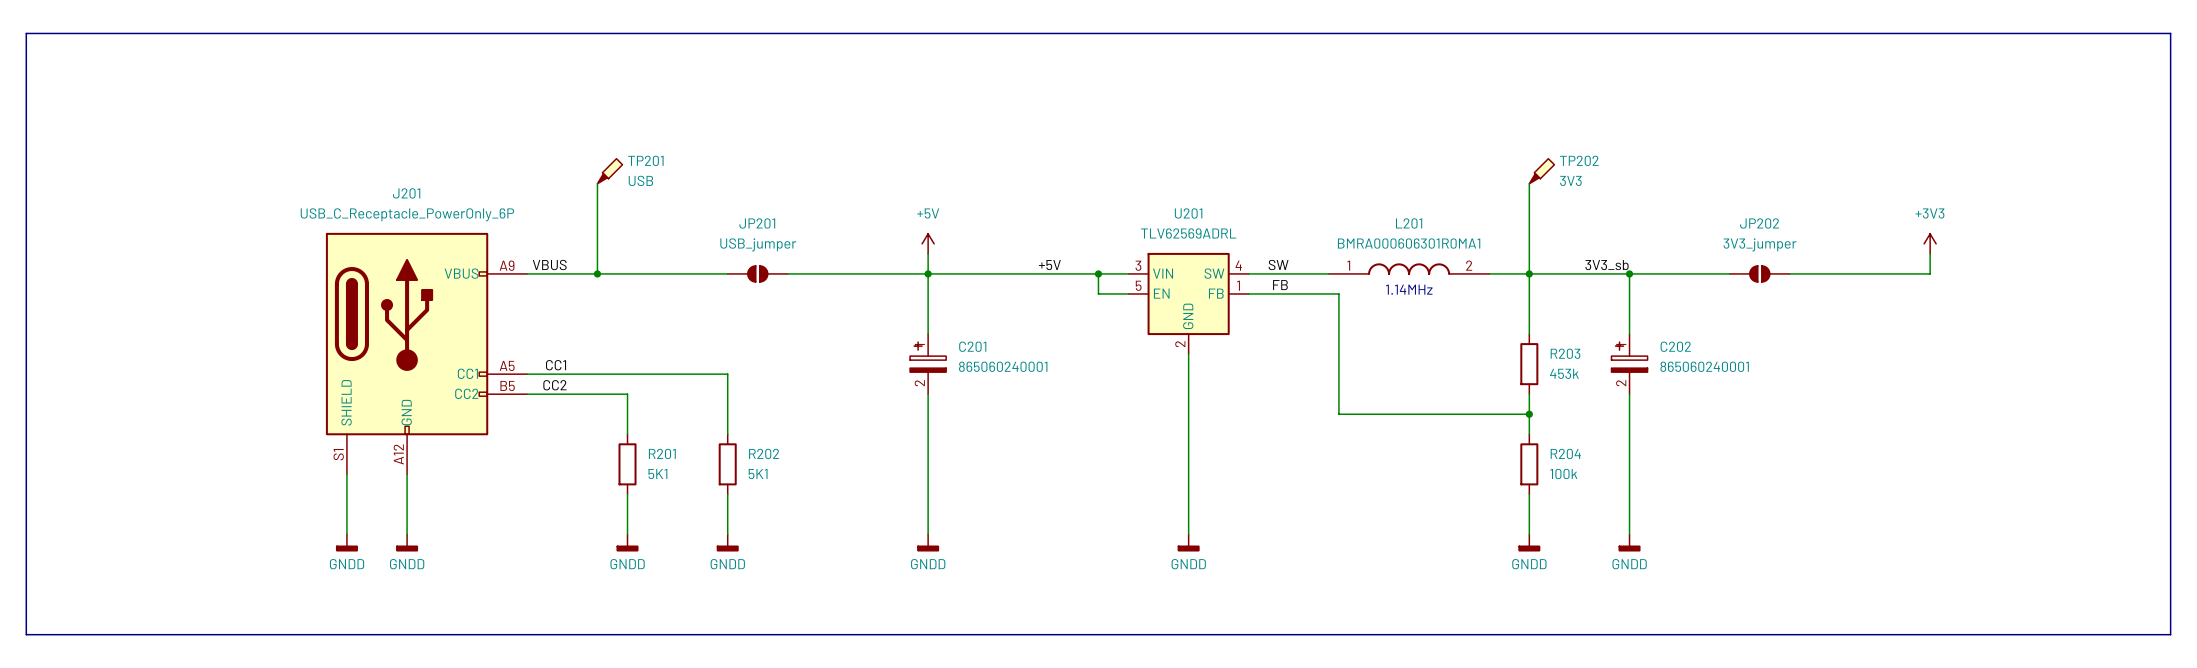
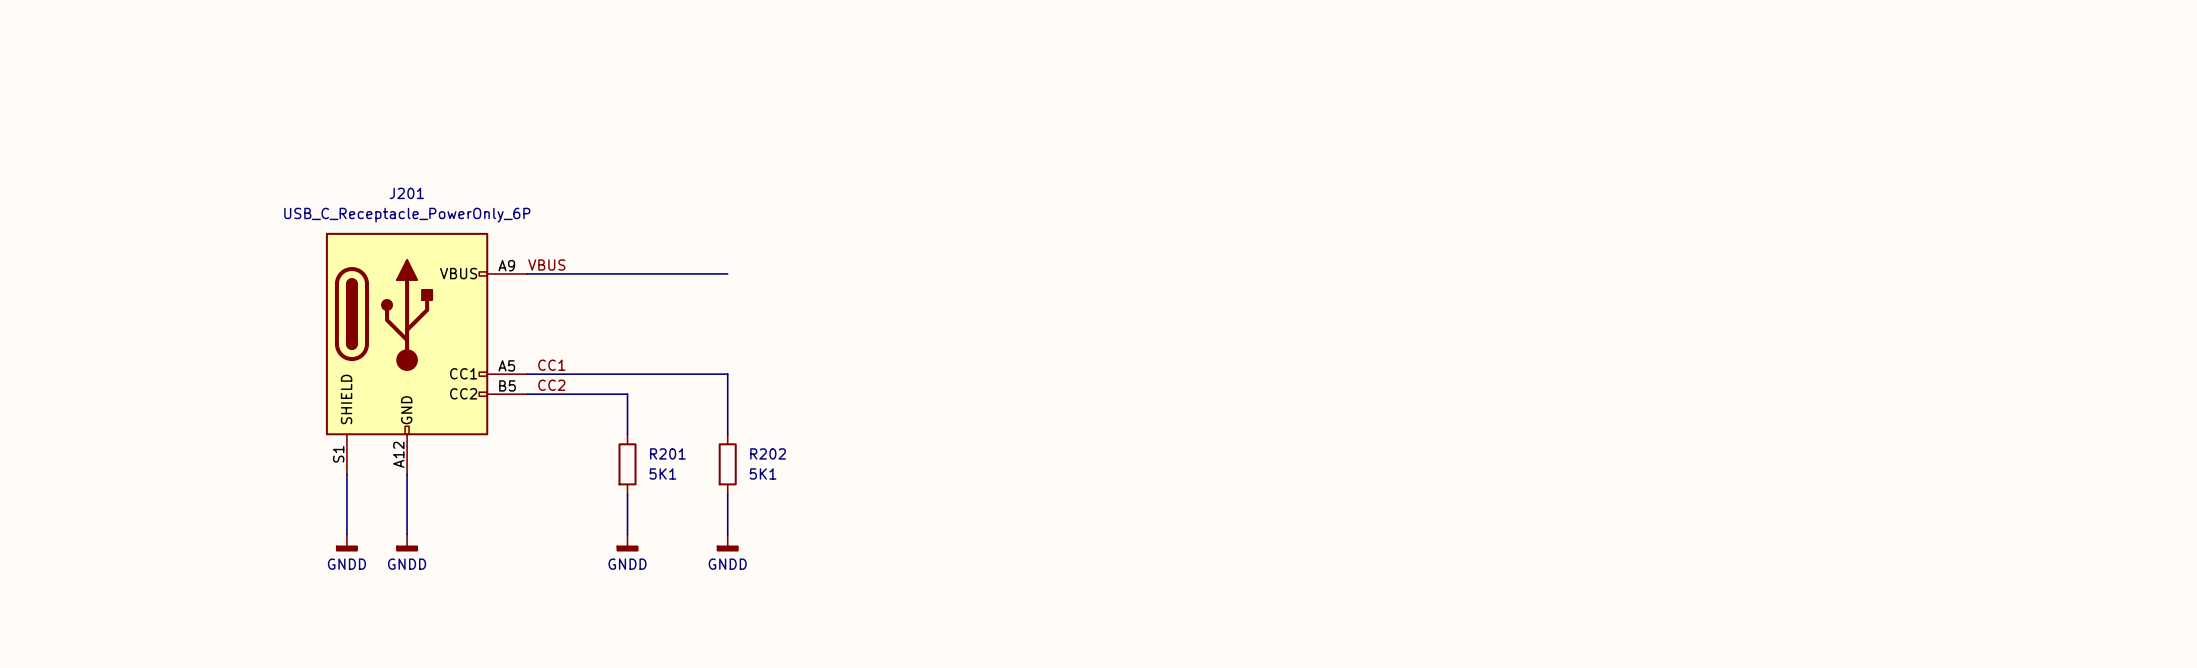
line: (26, 33) (2170, 33) (2170, 634) (26, 634) (26, 33) -> none
TP201: USB (609, 171) -> none
TP202: 3V3 (1541, 171) -> none
wire: (597, 183) (597, 273) -> none
wire: (1529, 183) (1529, 334) -> none
power symbol: +5V (928, 243) -> none
power symbol: +3V3 (1930, 243) -> none
wire: (928, 253) (928, 334) -> none
wire: (1930, 253) (1930, 273) (1789, 273) -> none
label: +5V (1049, 265) -> none
label: SW (1278, 265) -> none
label: 3V3_sb (1607, 265) -> none
L201: BMRA000606301R0MA1 (1409, 269) -> none
junction: (597, 273) -> none
JP201: USB_jumper (757, 273) -> none
wire: (787, 273) (1128, 273) -> none
junction: (928, 273) -> none
wire: (1098, 273) (1098, 293) (1128, 293) -> none
junction: (1098, 273) -> none
wire: (1248, 273) (1328, 273) -> none
wire: (1489, 273) (1729, 273) -> none
junction: (1529, 273) -> none
wire: (1629, 273) (1629, 334) -> none
junction: (1629, 273) -> none
JP202: 3V3_jumper (1759, 273) -> none
label: FB (1280, 285) -> none
text: 1.14MHz (1409, 289) -> none
wire: (1248, 293) (1338, 293) (1338, 414) (1529, 414) -> none
U201: TLV62569ADRL (1188, 303) -> none
wire: (1188, 354) (1188, 534) -> none
C201: 865060240001 (928, 364) -> none
R203: 453k (1529, 364) -> none
C202: 865060240001 (1629, 364) -> none
wire: (928, 394) (928, 534) -> none
wire: (1529, 394) (1529, 434) -> none
wire: (1629, 394) (1629, 534) -> none
junction: (1529, 414) -> none
R204: 100k (1529, 464) -> none
wire: (1529, 494) (1529, 534) -> none
power symbol: GNDD (928, 542) -> none
power symbol: GNDD (1188, 542) -> none
power symbol: GNDD (1529, 542) -> none
power symbol: GNDD (1629, 542) -> none

